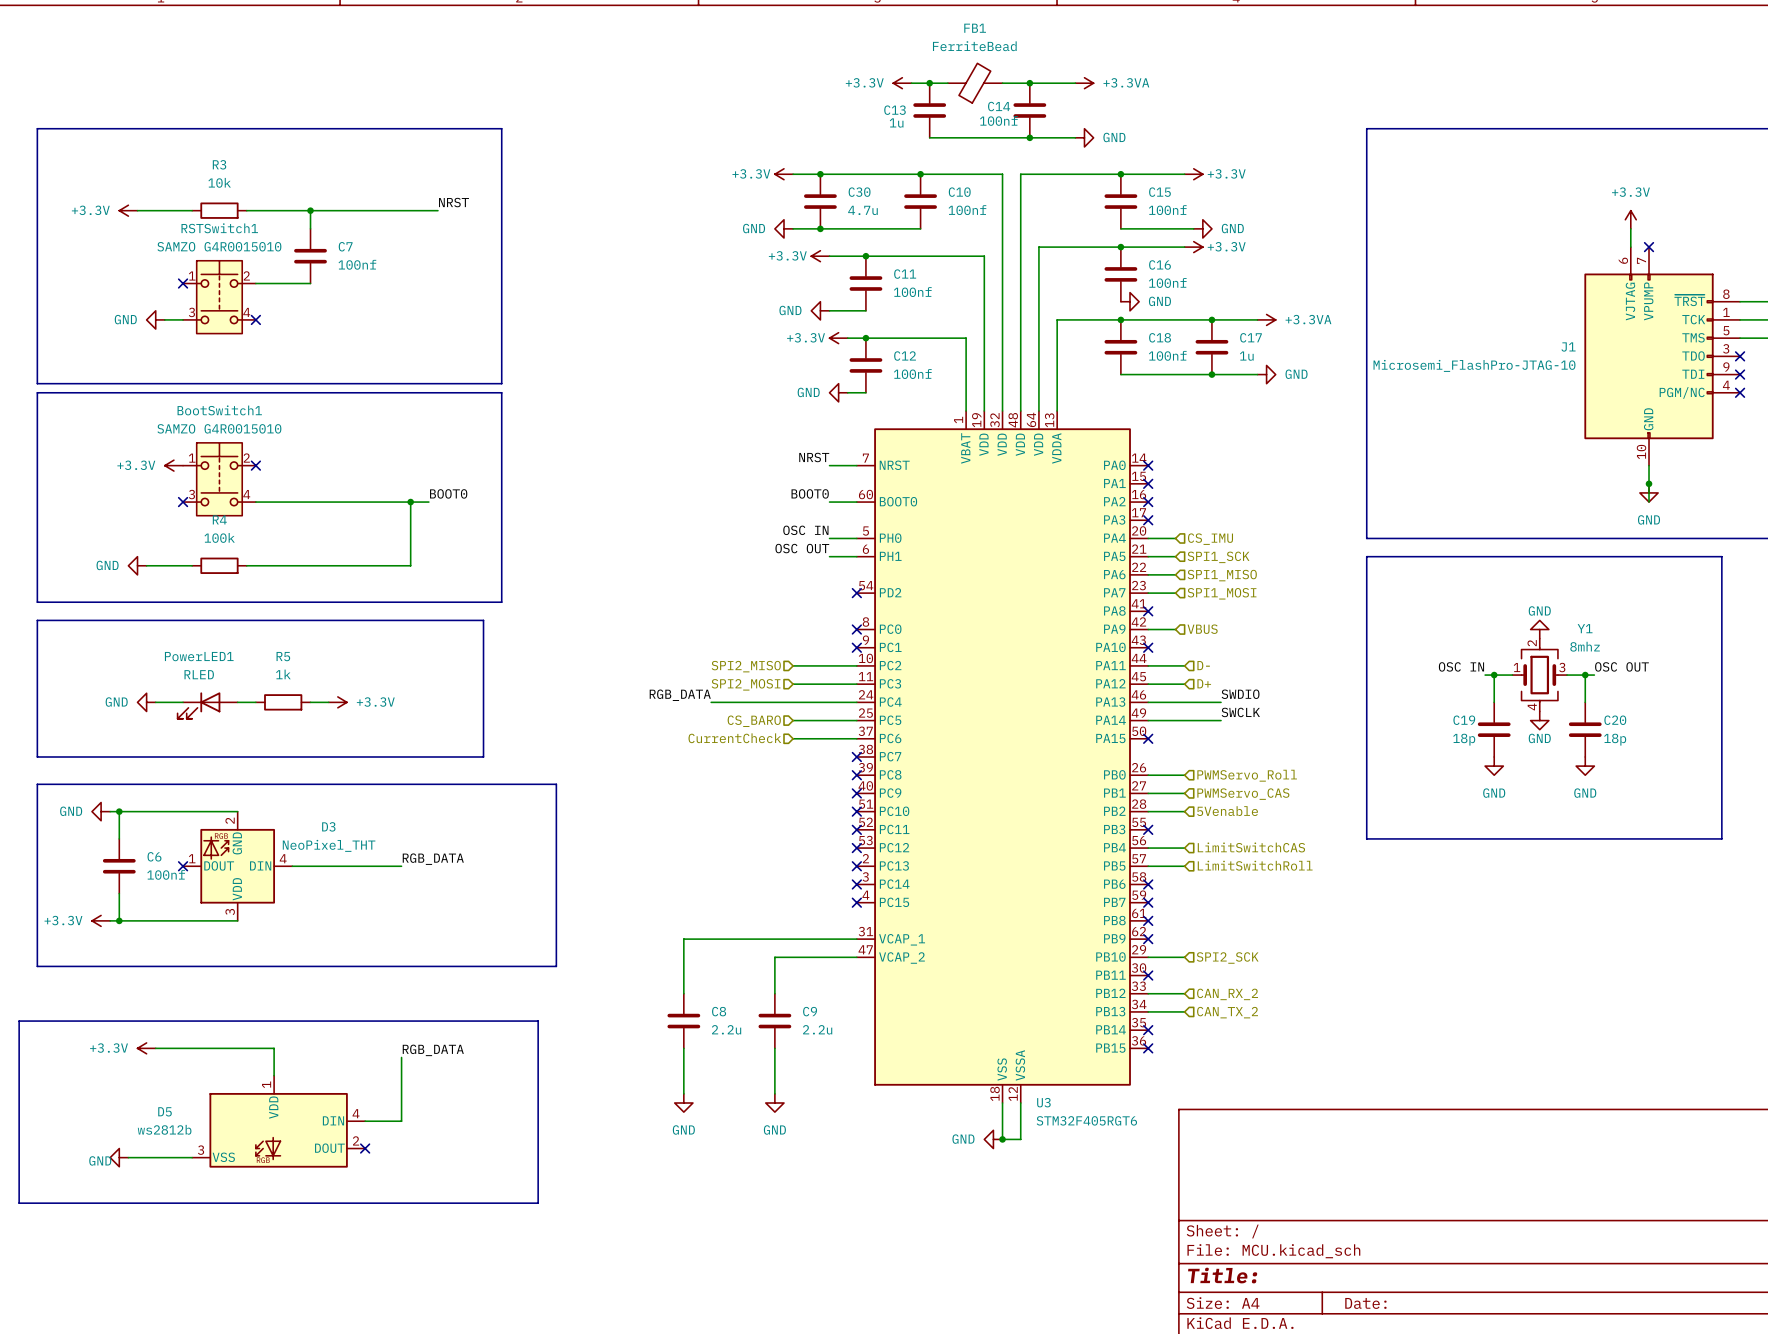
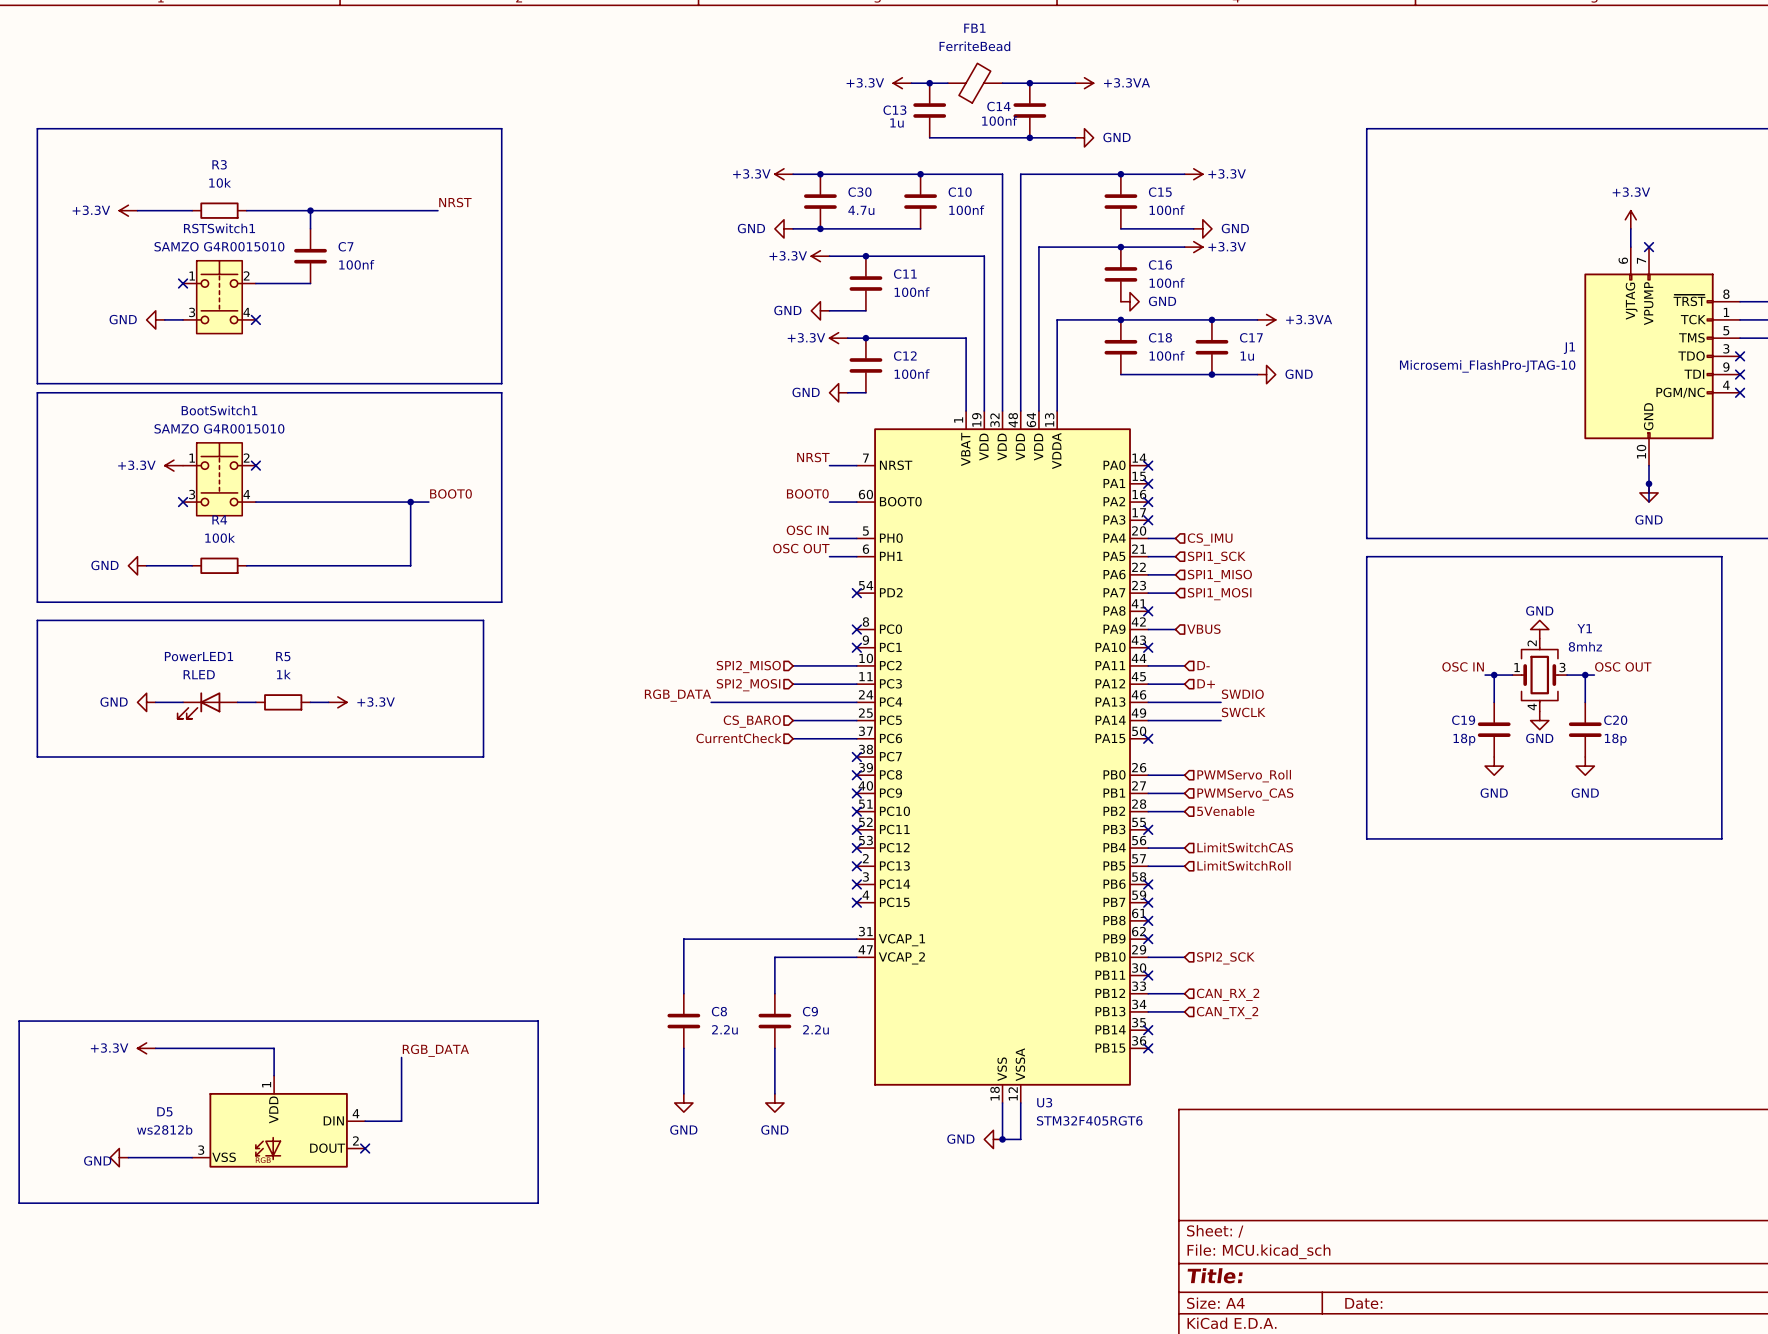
line: (37, 784) (556, 784) (556, 966) (37, 966) (37, 784) -> none
power symbol: GND (101, 811) -> none
wire: (110, 811) (237, 811) -> none
wire: (119, 811) (119, 838) -> none
junction: (119, 811) -> none
label: RGB_DATA (433, 859) -> none
C6: 100nf (119, 866) -> none
no-connect mark: (183, 866) -> none
D3: NeoPixel_THT (237, 866) -> none
wire: (292, 866) (401, 866) -> none
wire: (119, 893) (119, 920) -> none
power symbol: +3.3V (101, 920) -> none
wire: (110, 920) (237, 920) -> none
junction: (119, 920) -> none

